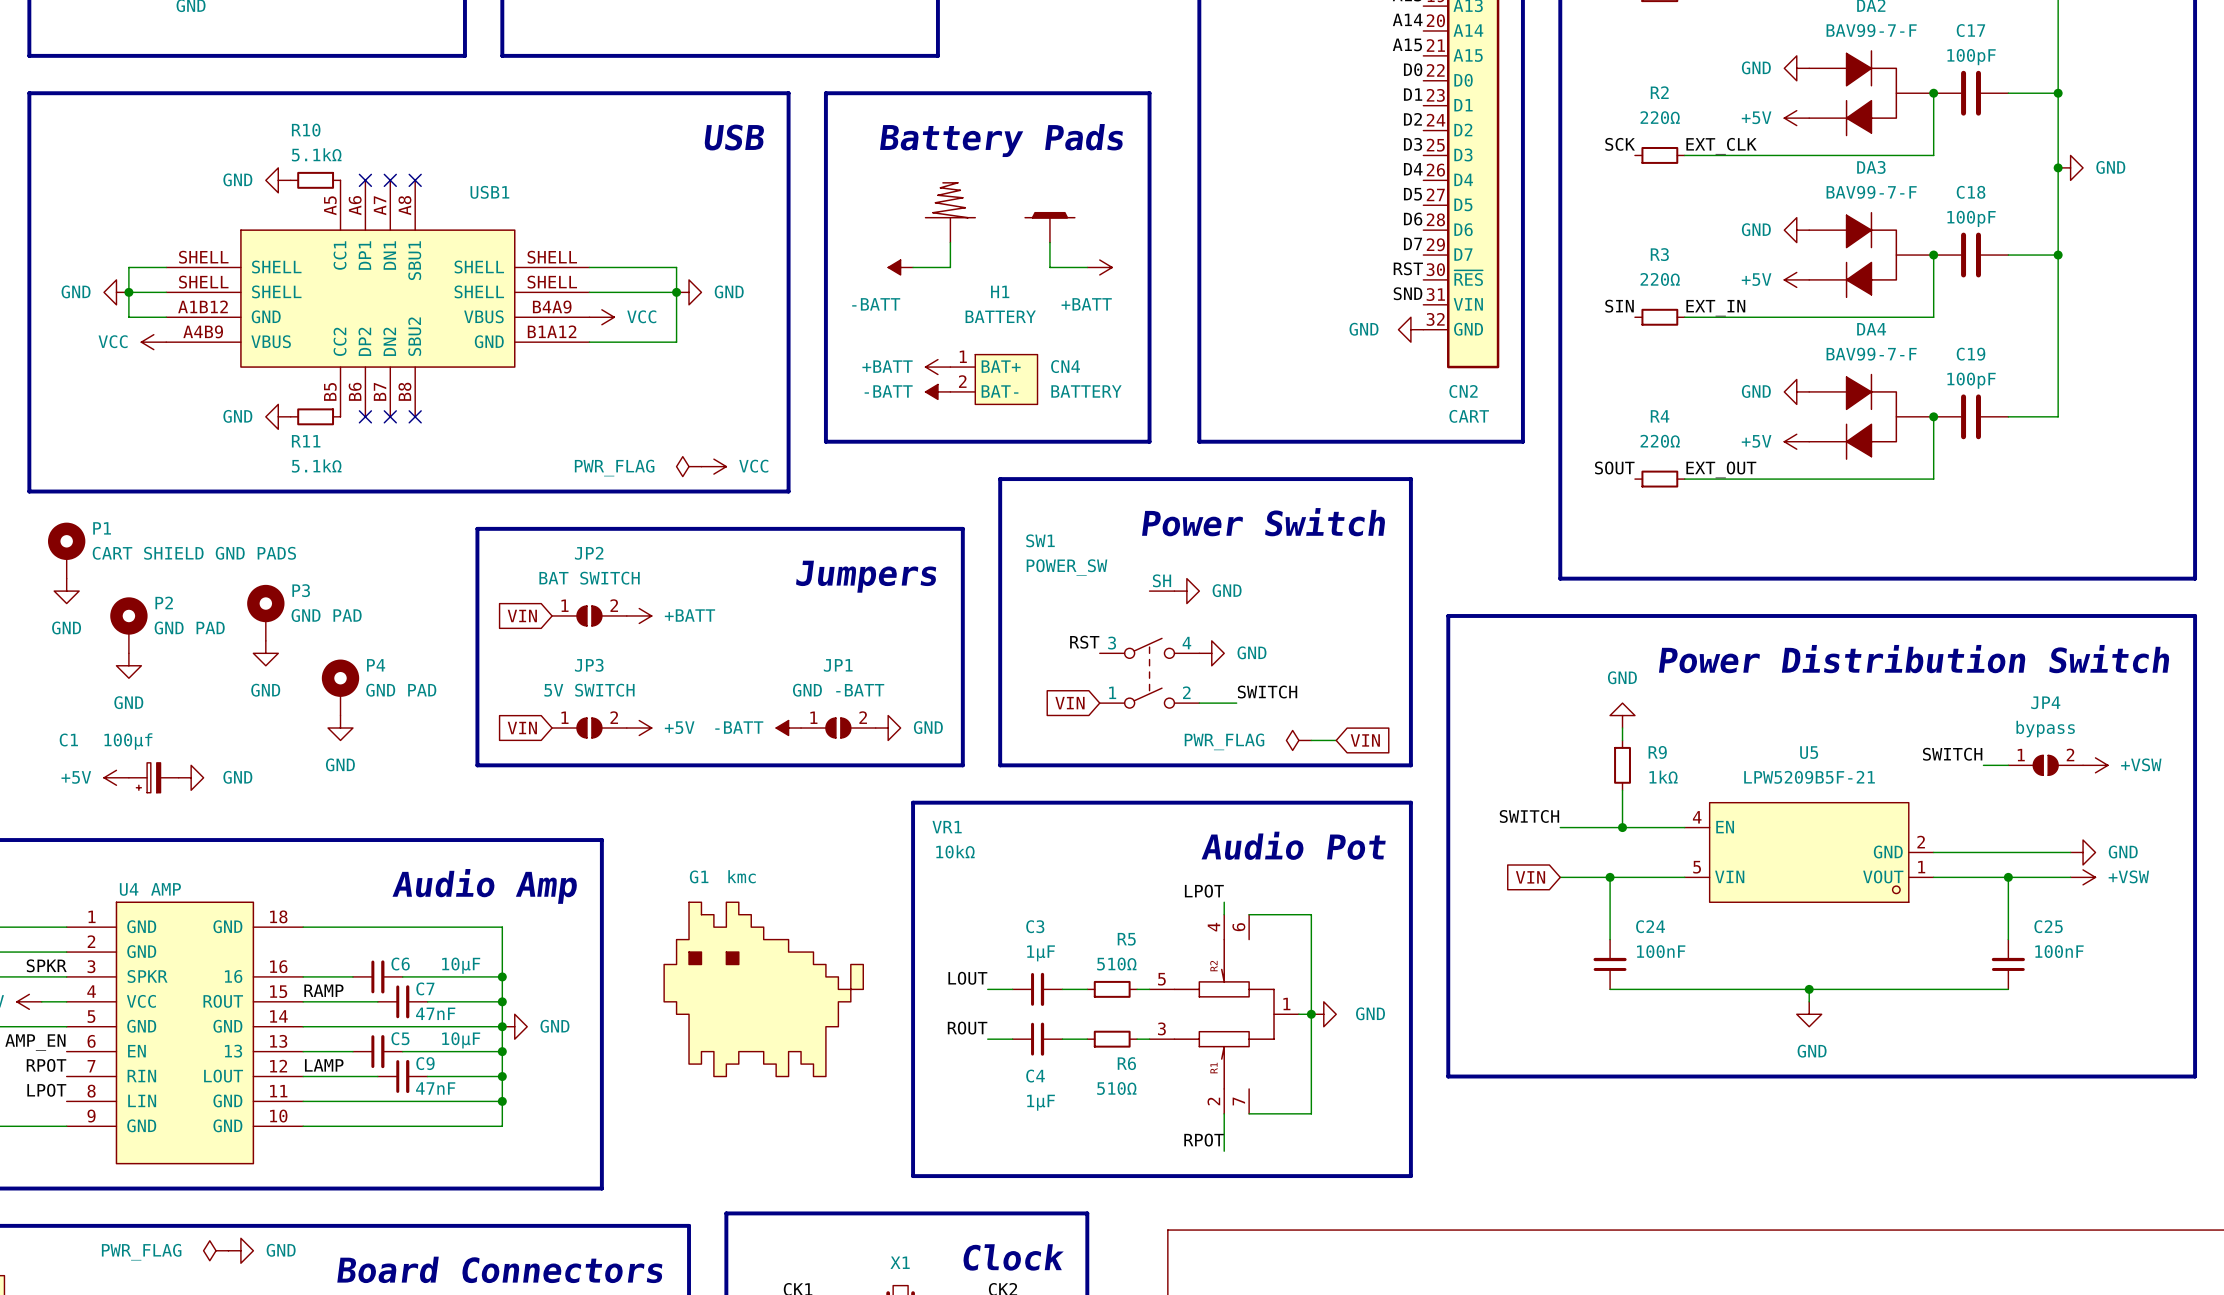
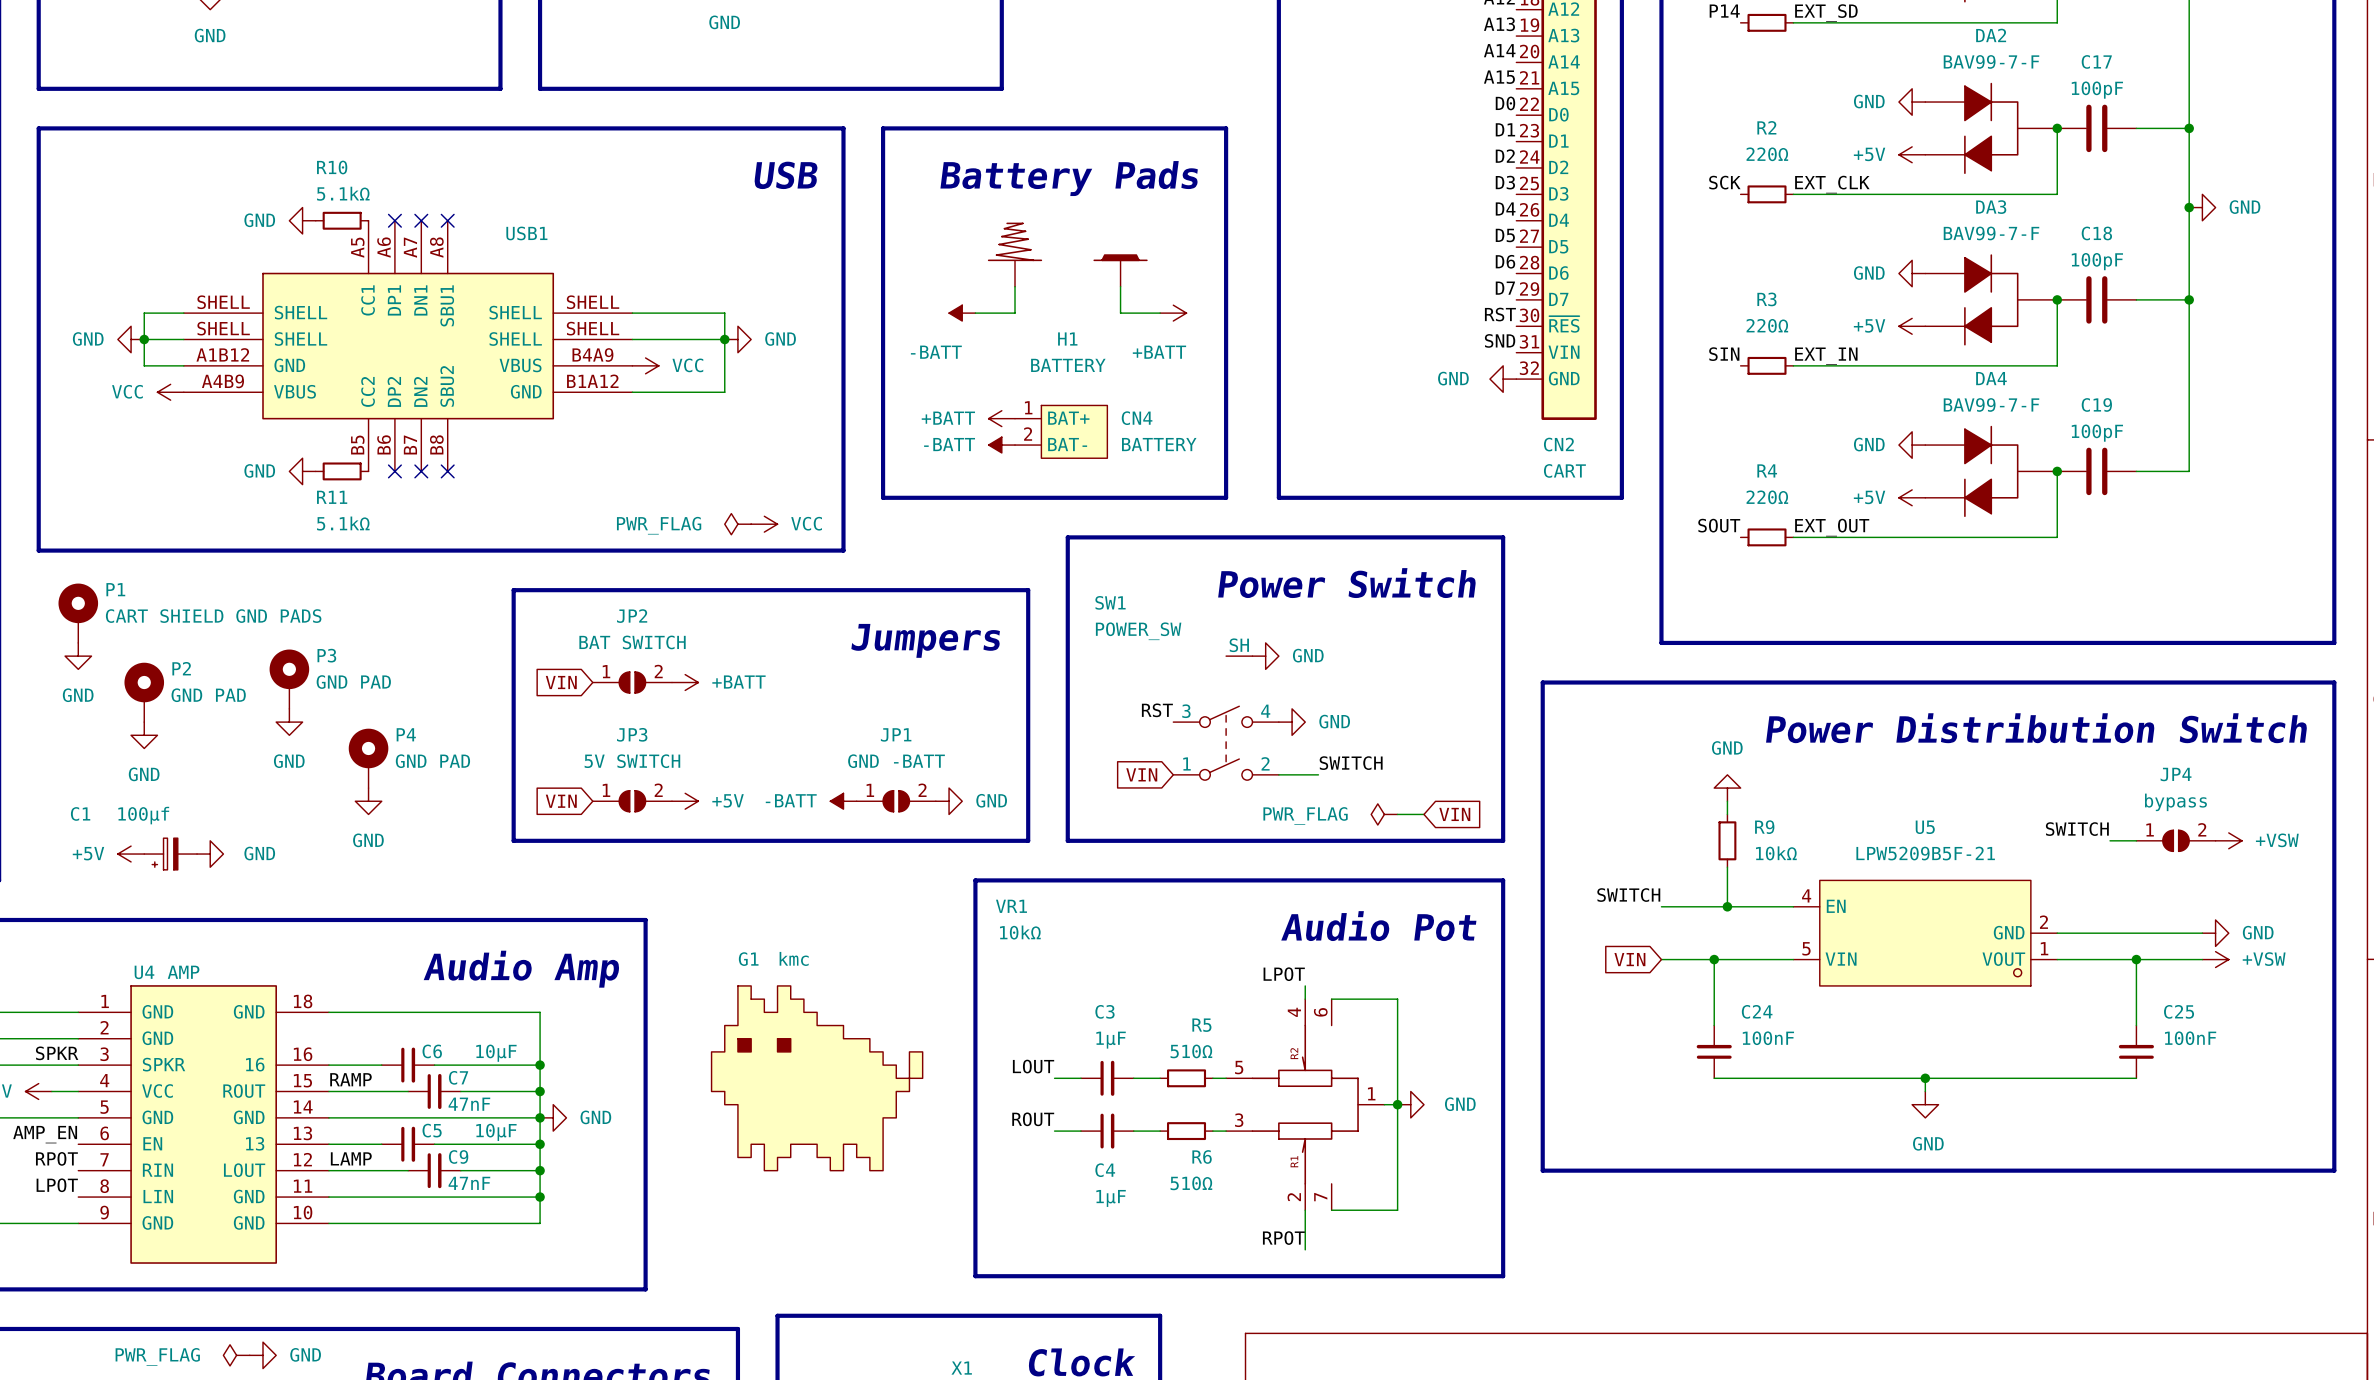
R9 value: 1kΩ (1663, 777) -> 10kΩ (1776, 853)

